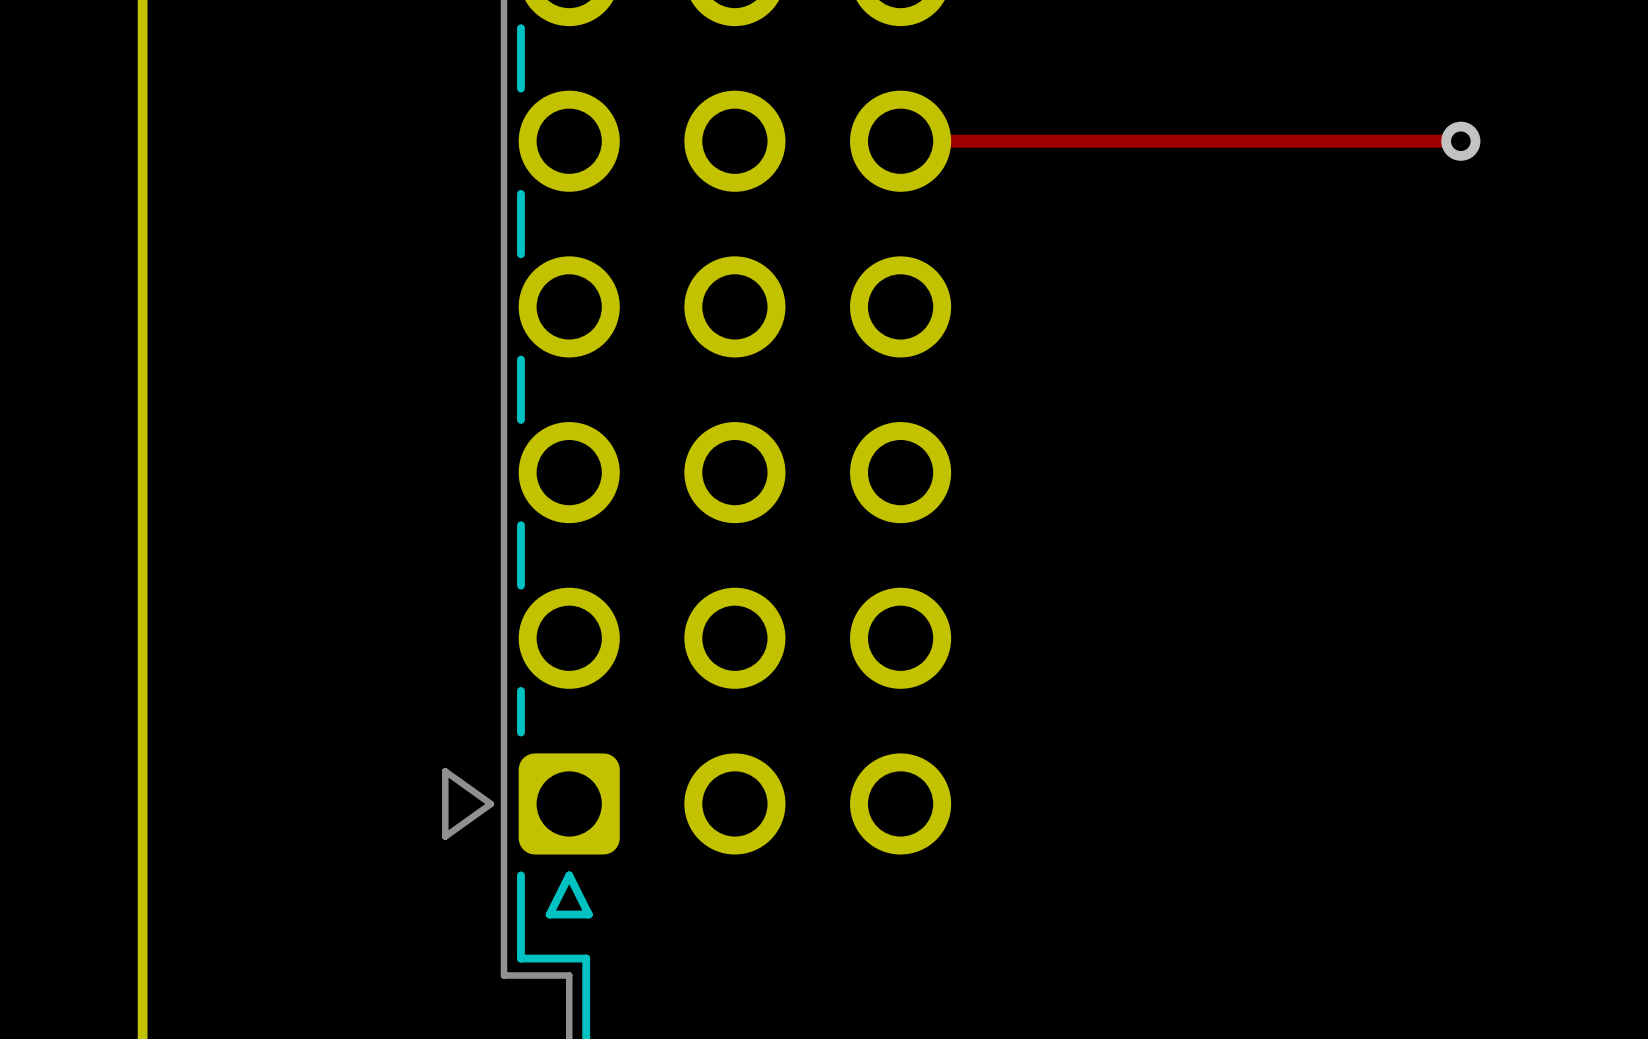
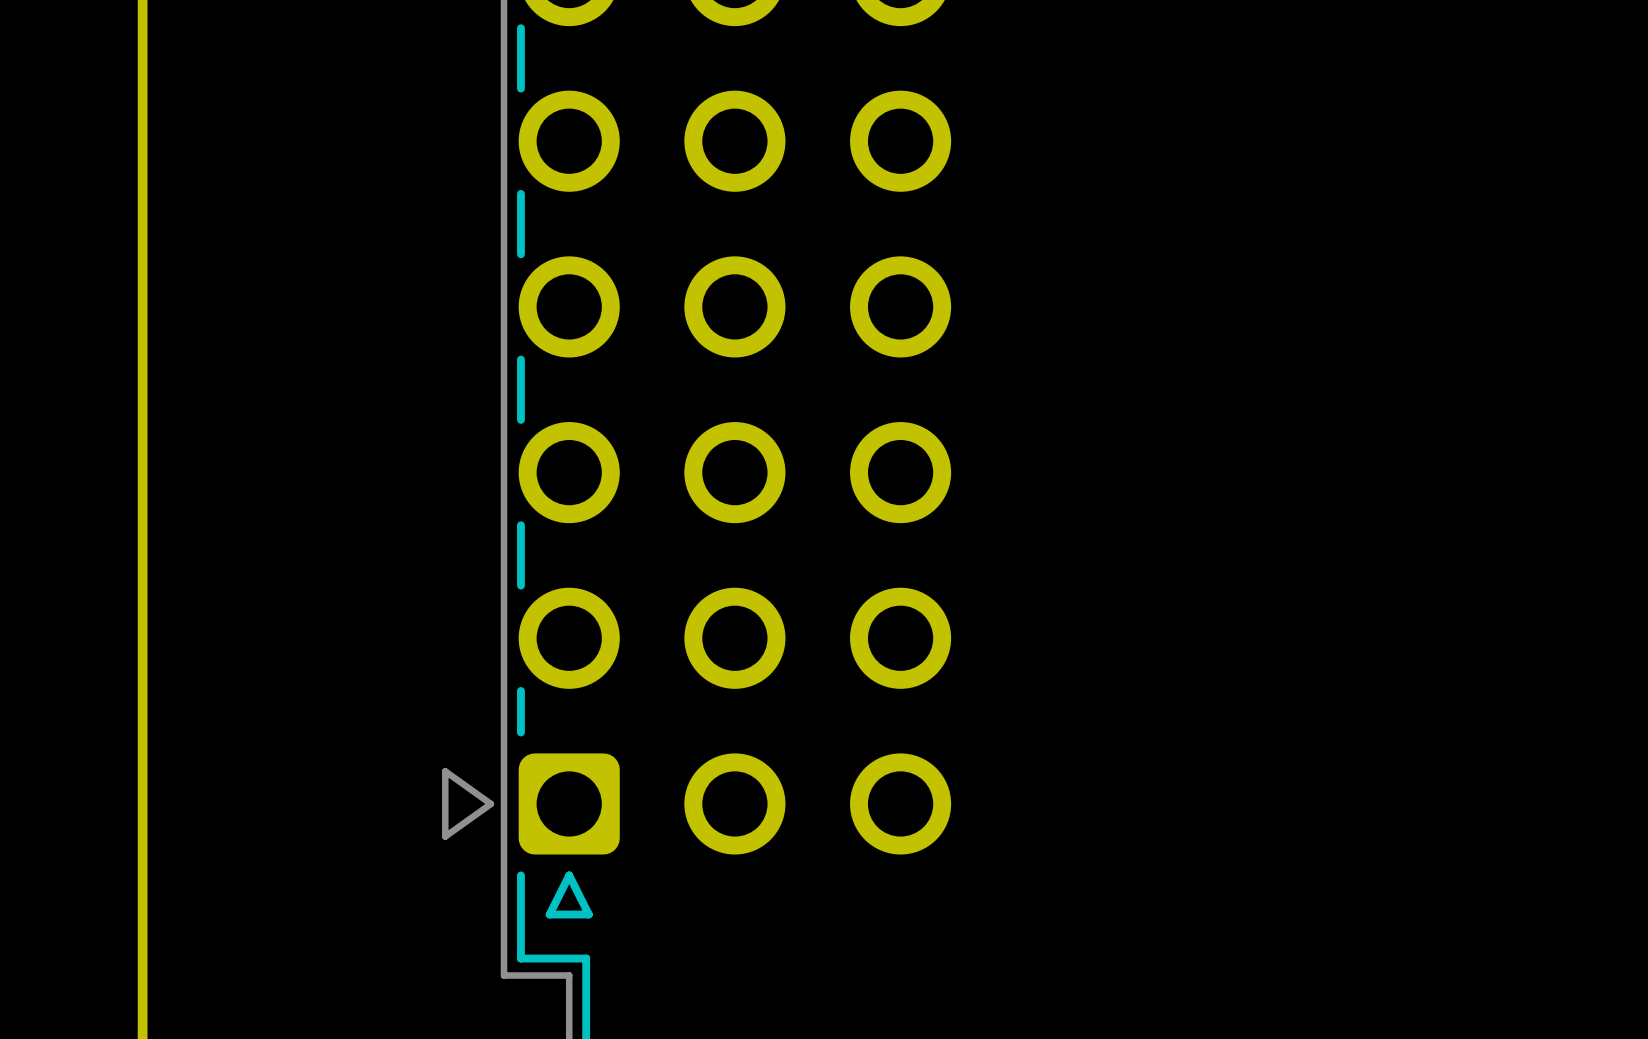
track: (900, 141) (1460, 141) -> none
via: (1460, 141) -> none

